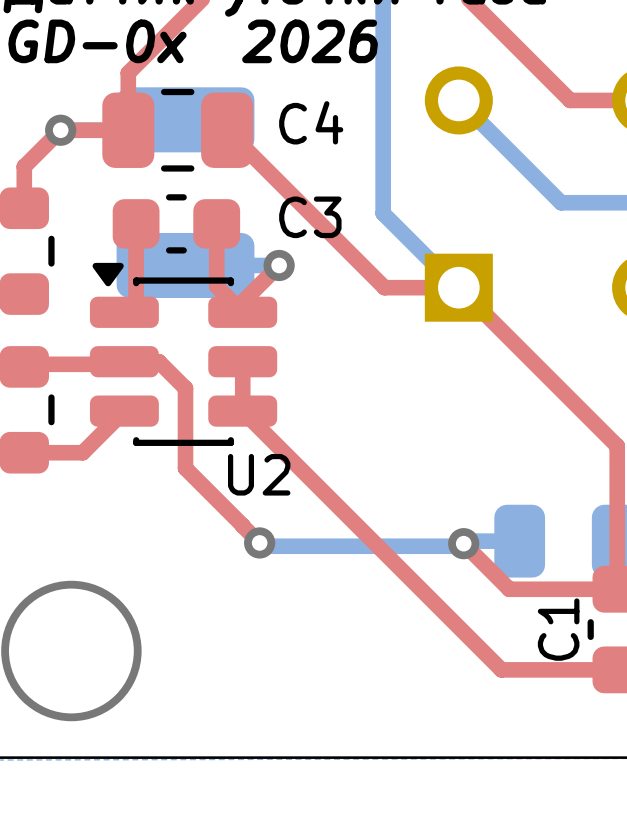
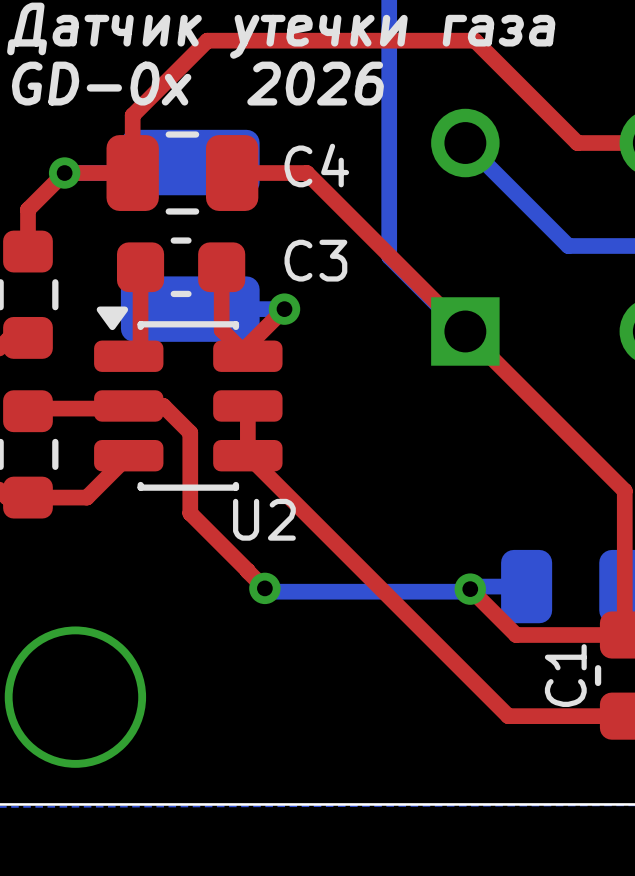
top track: (227, 130) (384, 287) (458, 287) -> (232, 173) (306, 173) (465, 331)

